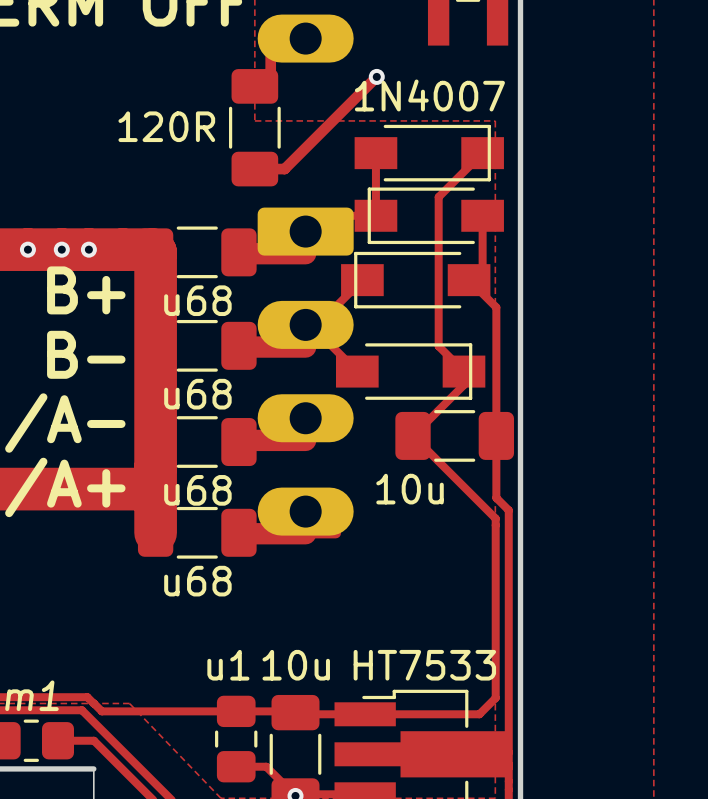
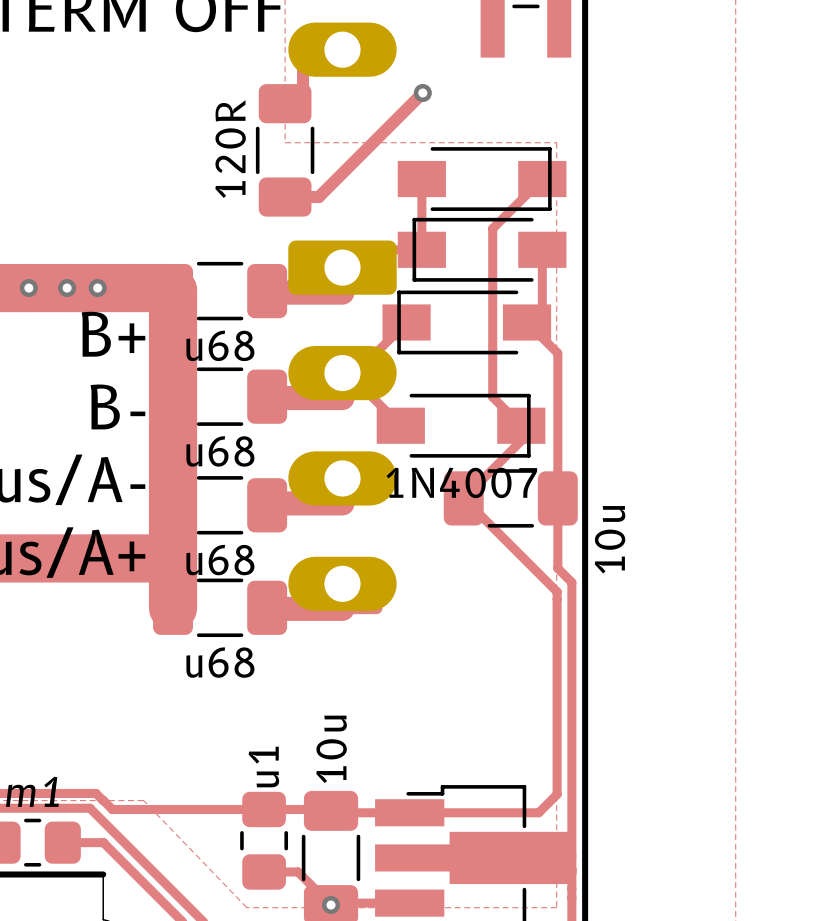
part value: 1N4007 (429, 95) -> none
part value rotation: 0° (166, 126) -> 90° counterclockwise (230, 149)
part value: none -> 1N4007 (461, 482)
part value rotation: 0° (410, 489) -> 90° counterclockwise (610, 539)
part value position: 10u (410, 489) -> 10u (610, 539)
part value rotation: 0° (228, 665) -> 90° counterclockwise (263, 767)
part value rotation: 0° (296, 665) -> 90° counterclockwise (331, 749)
part value: HT7533 (424, 665) -> none

